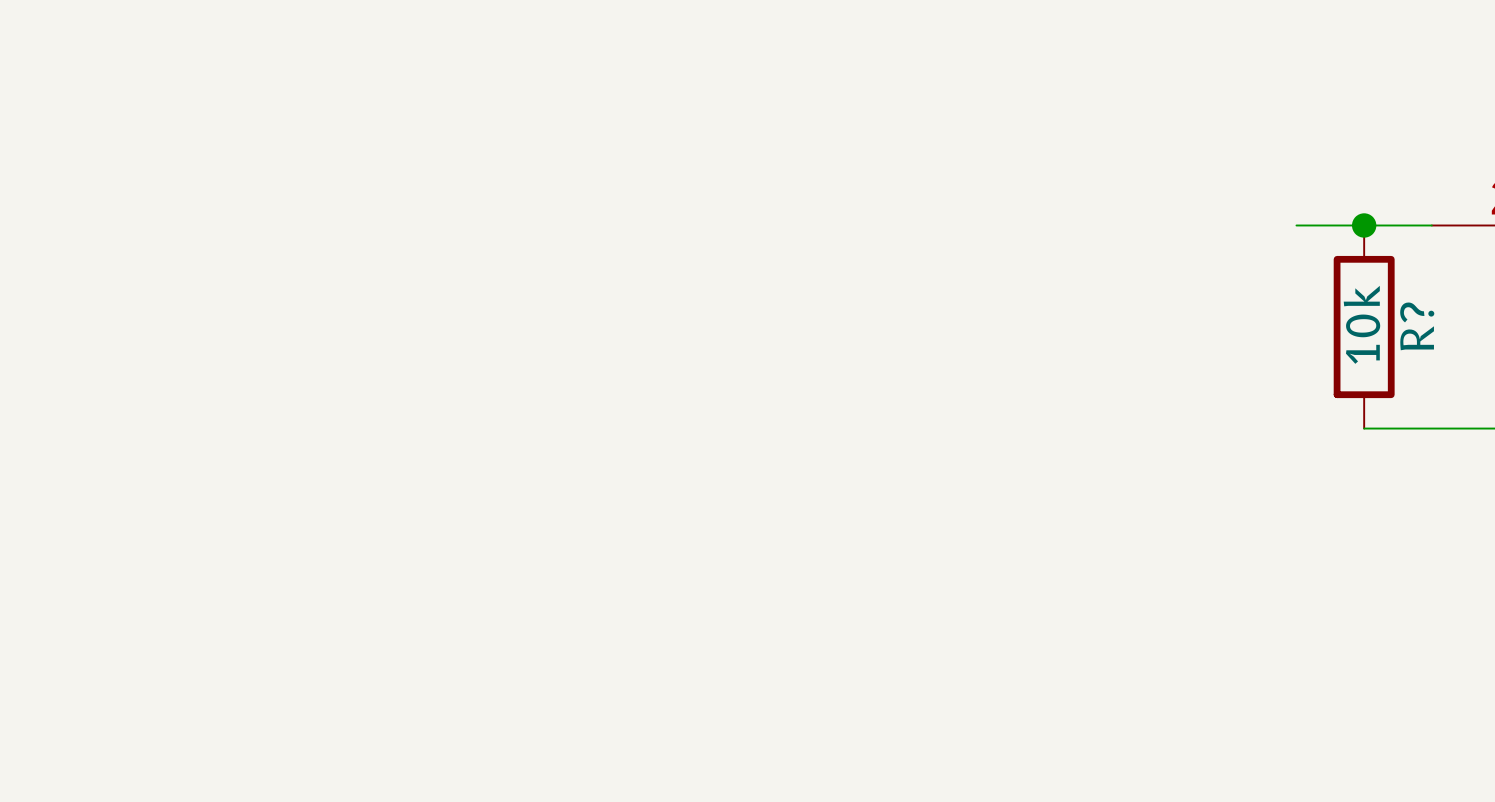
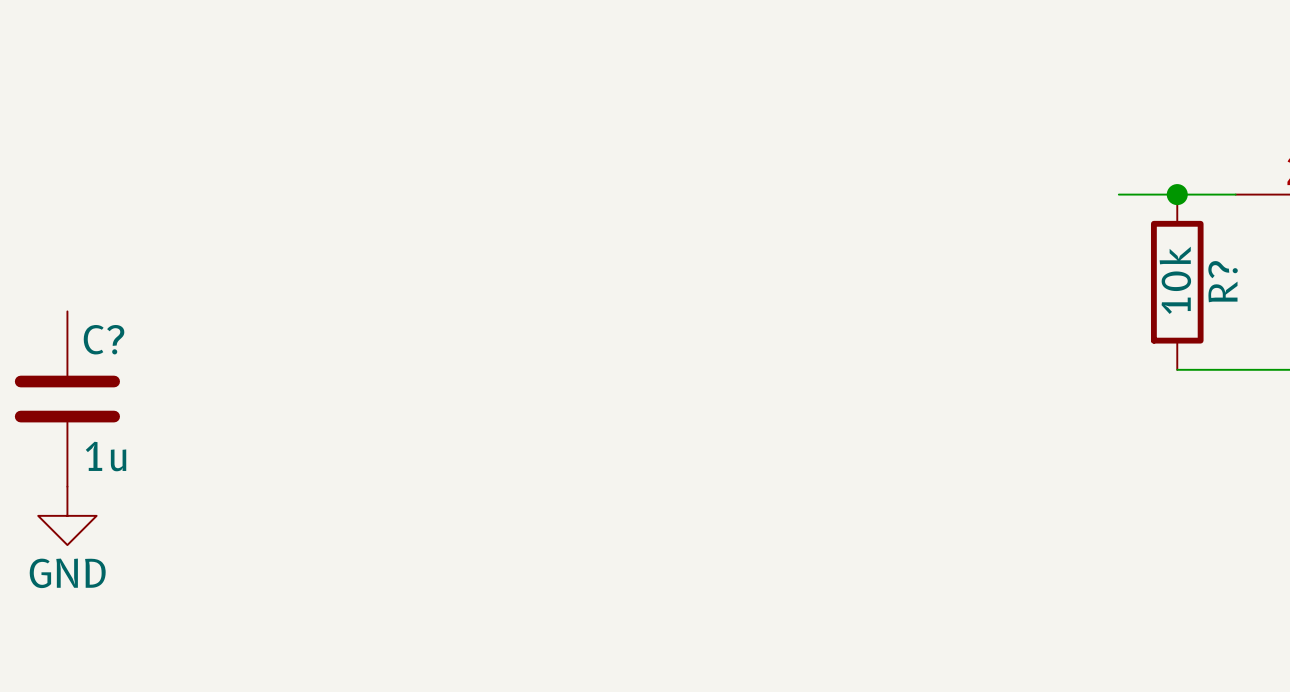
C?: none -> 1u (67, 399)
power symbol: none -> GND (67, 515)

